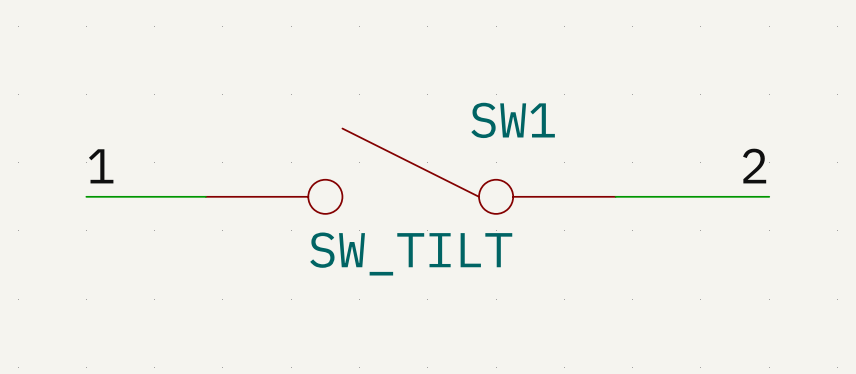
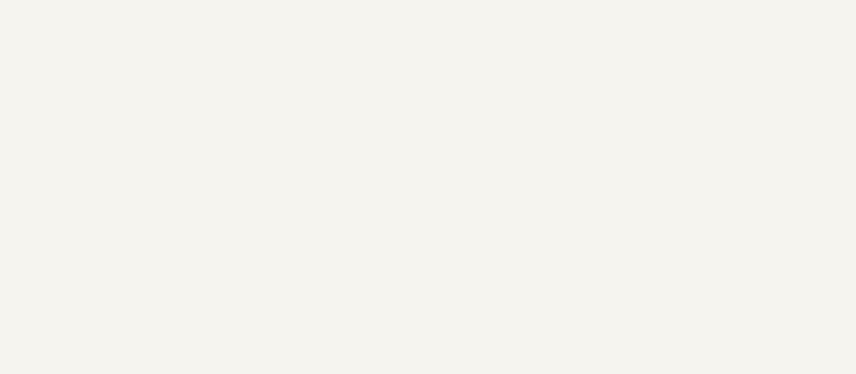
label: 1 (101, 166) -> none
label: 2 (754, 166) -> none
SW1: SW_TILT (410, 171) -> none
wire: (86, 196) (205, 196) -> none
wire: (615, 196) (769, 196) -> none

